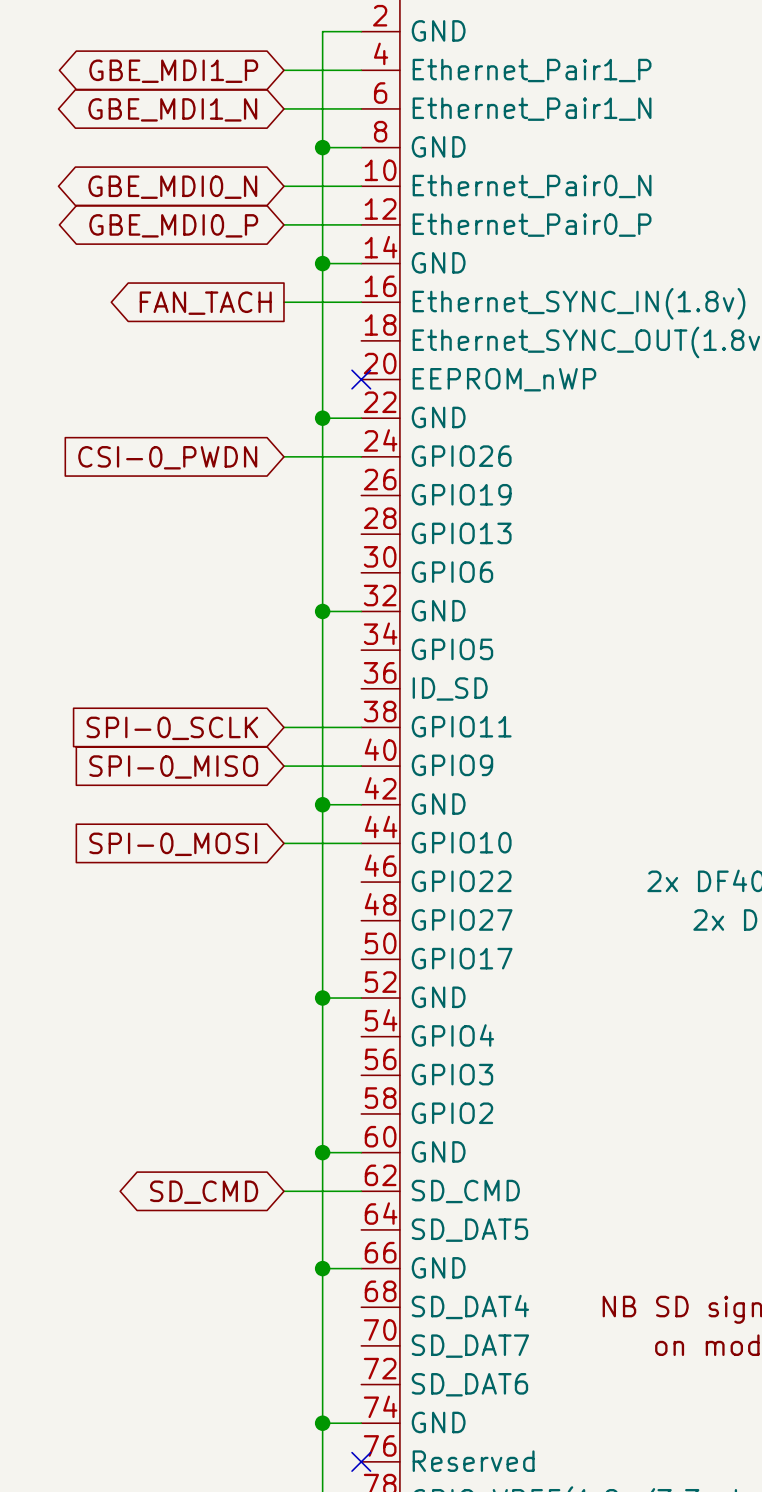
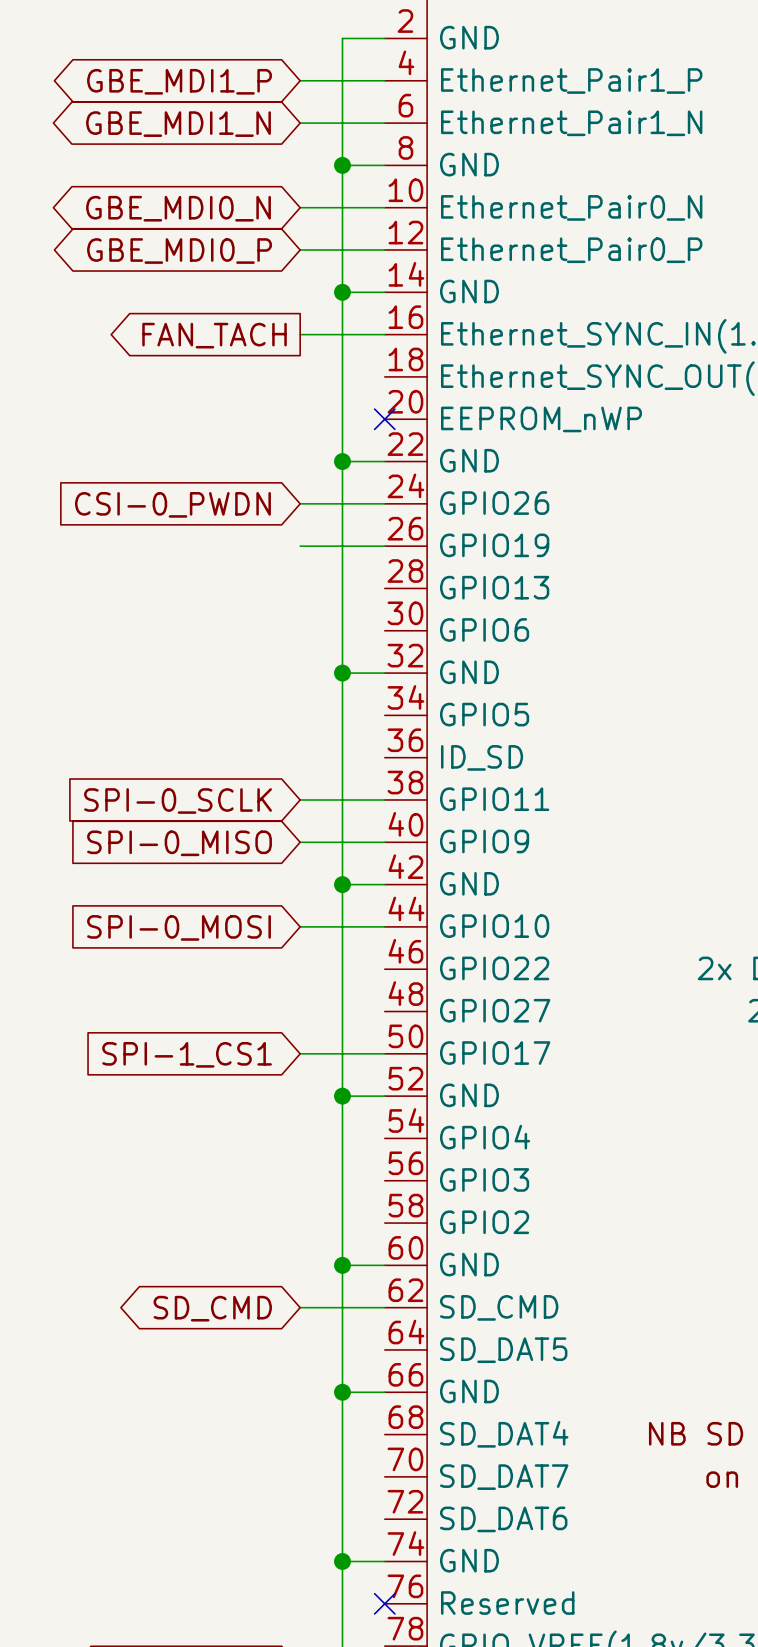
wire: none -> (300, 546) (384, 546)
wire: none -> (300, 1053) (384, 1053)
global label: none -> SPI-1_CS1 (187, 1054)

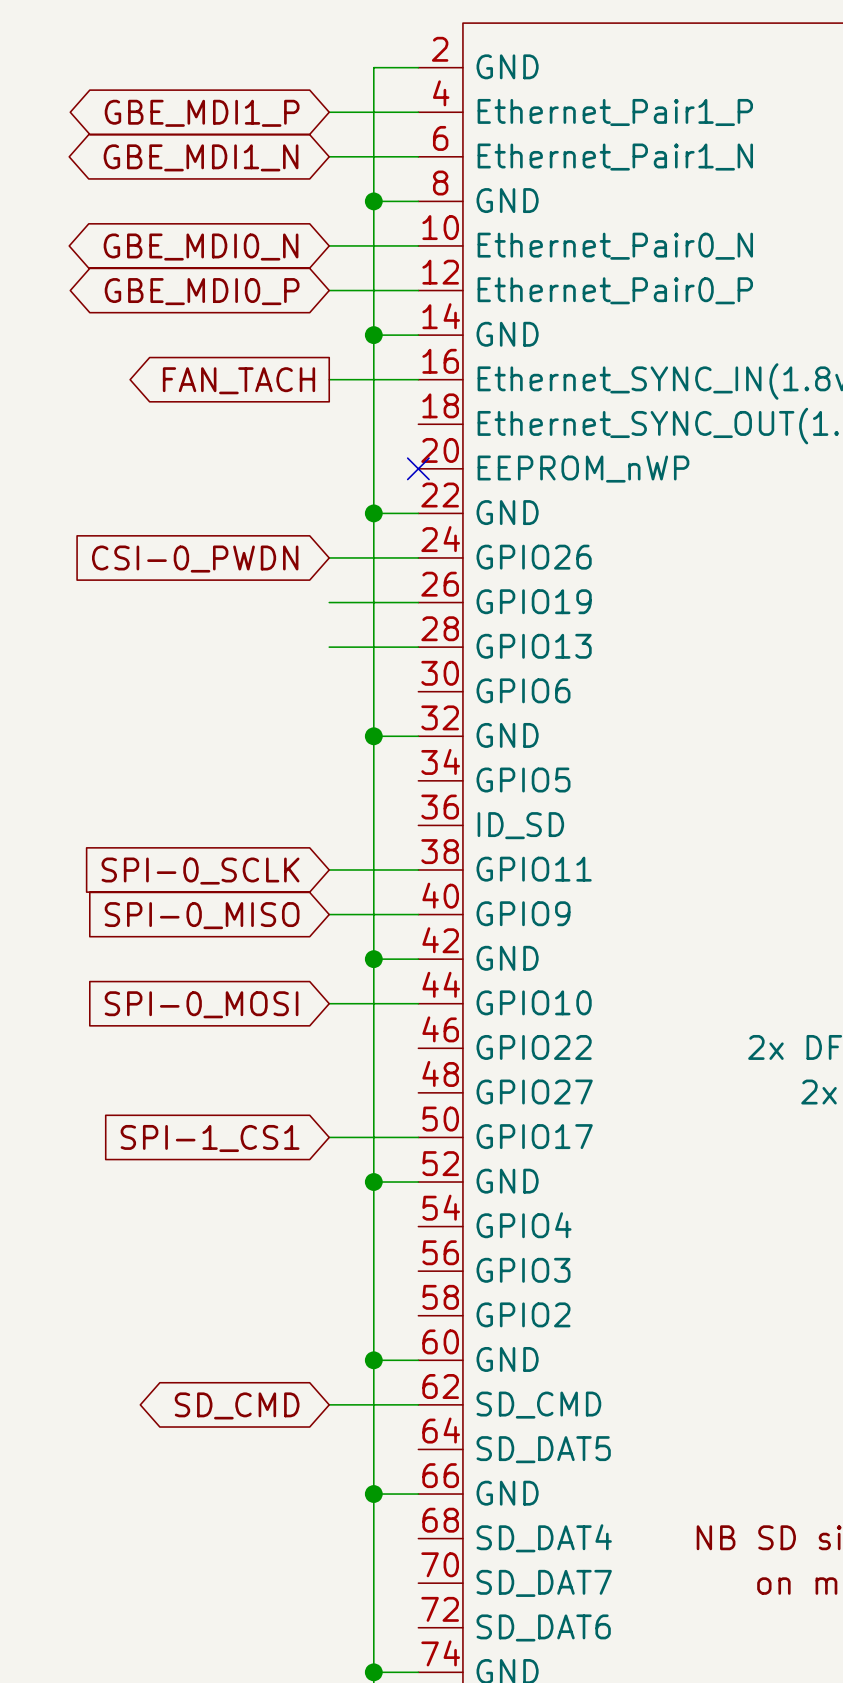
wire: none -> (329, 647) (418, 647)

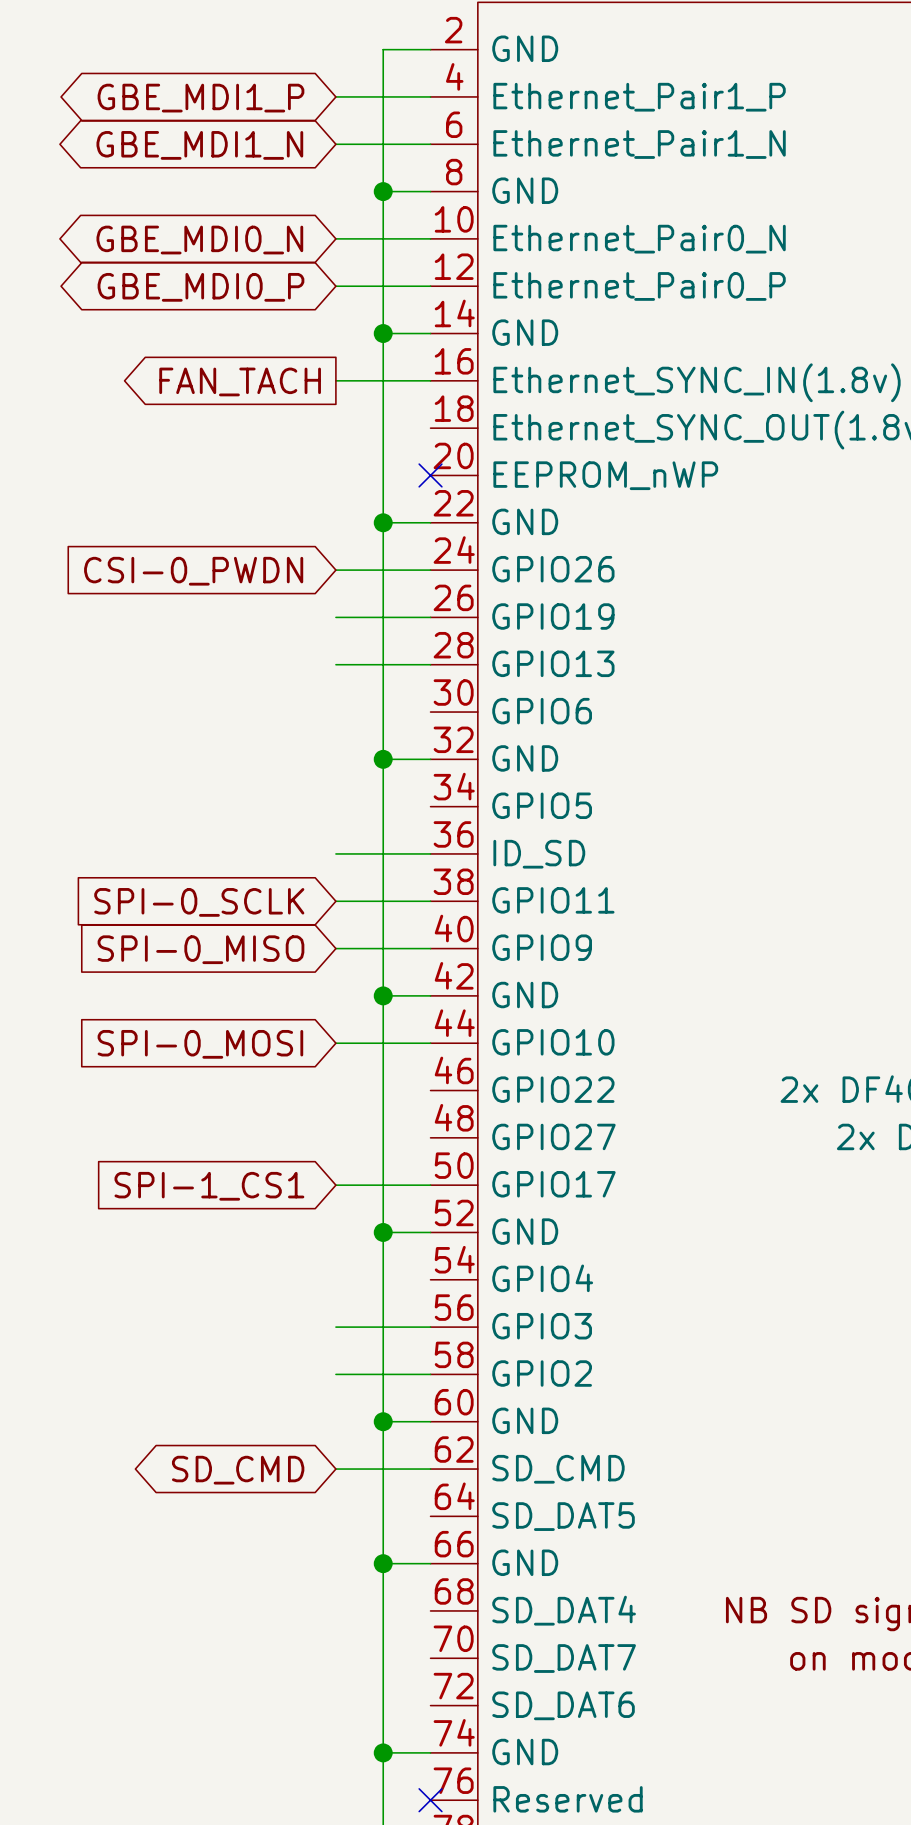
wire: none -> (335, 853) (430, 853)
wire: none -> (335, 1327) (430, 1327)
wire: none -> (335, 1374) (430, 1374)

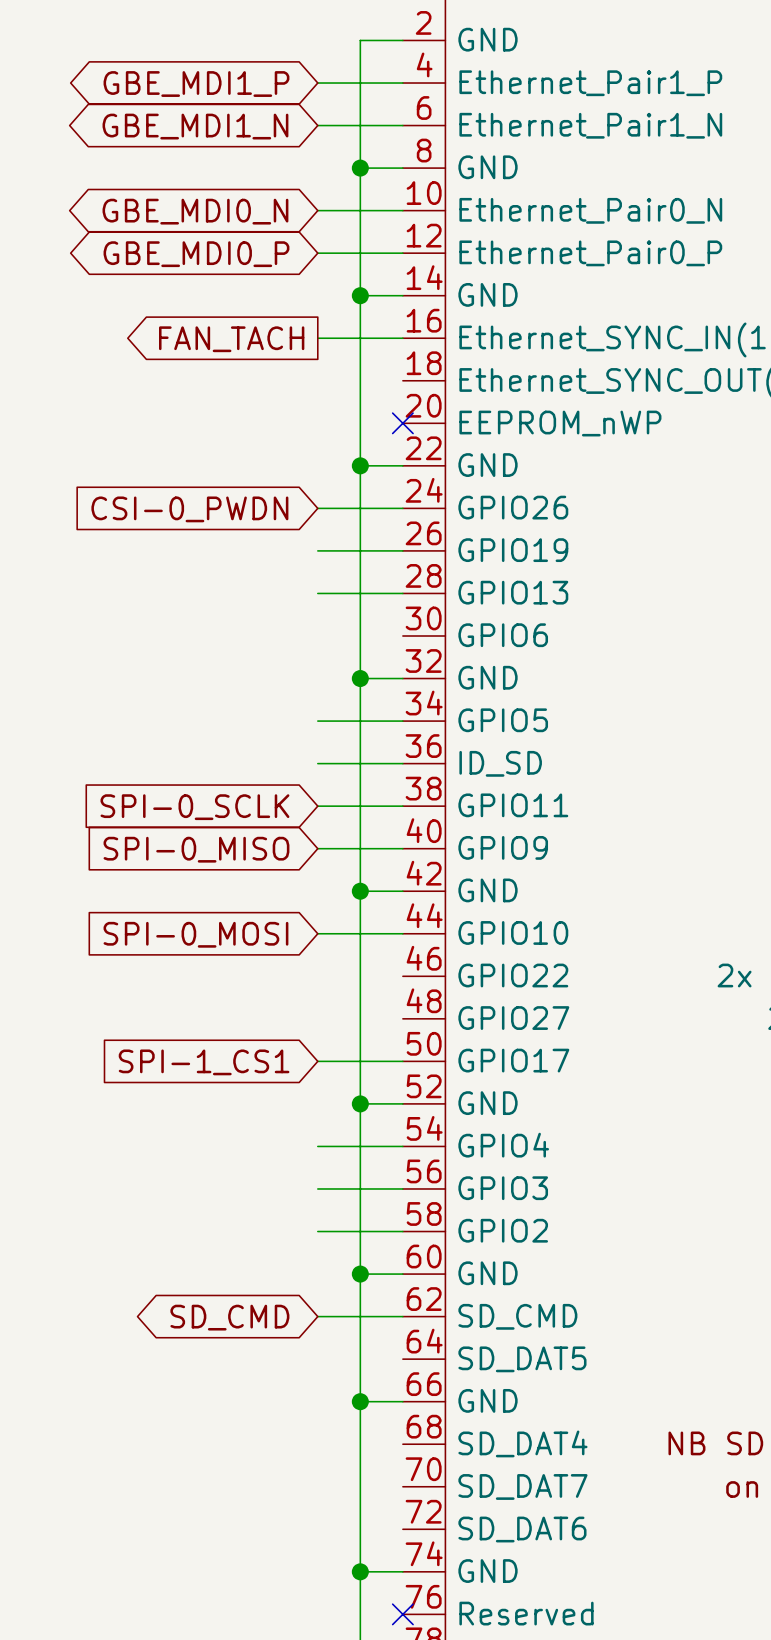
wire: none -> (317, 721) (402, 721)
wire: none -> (317, 1146) (402, 1146)

